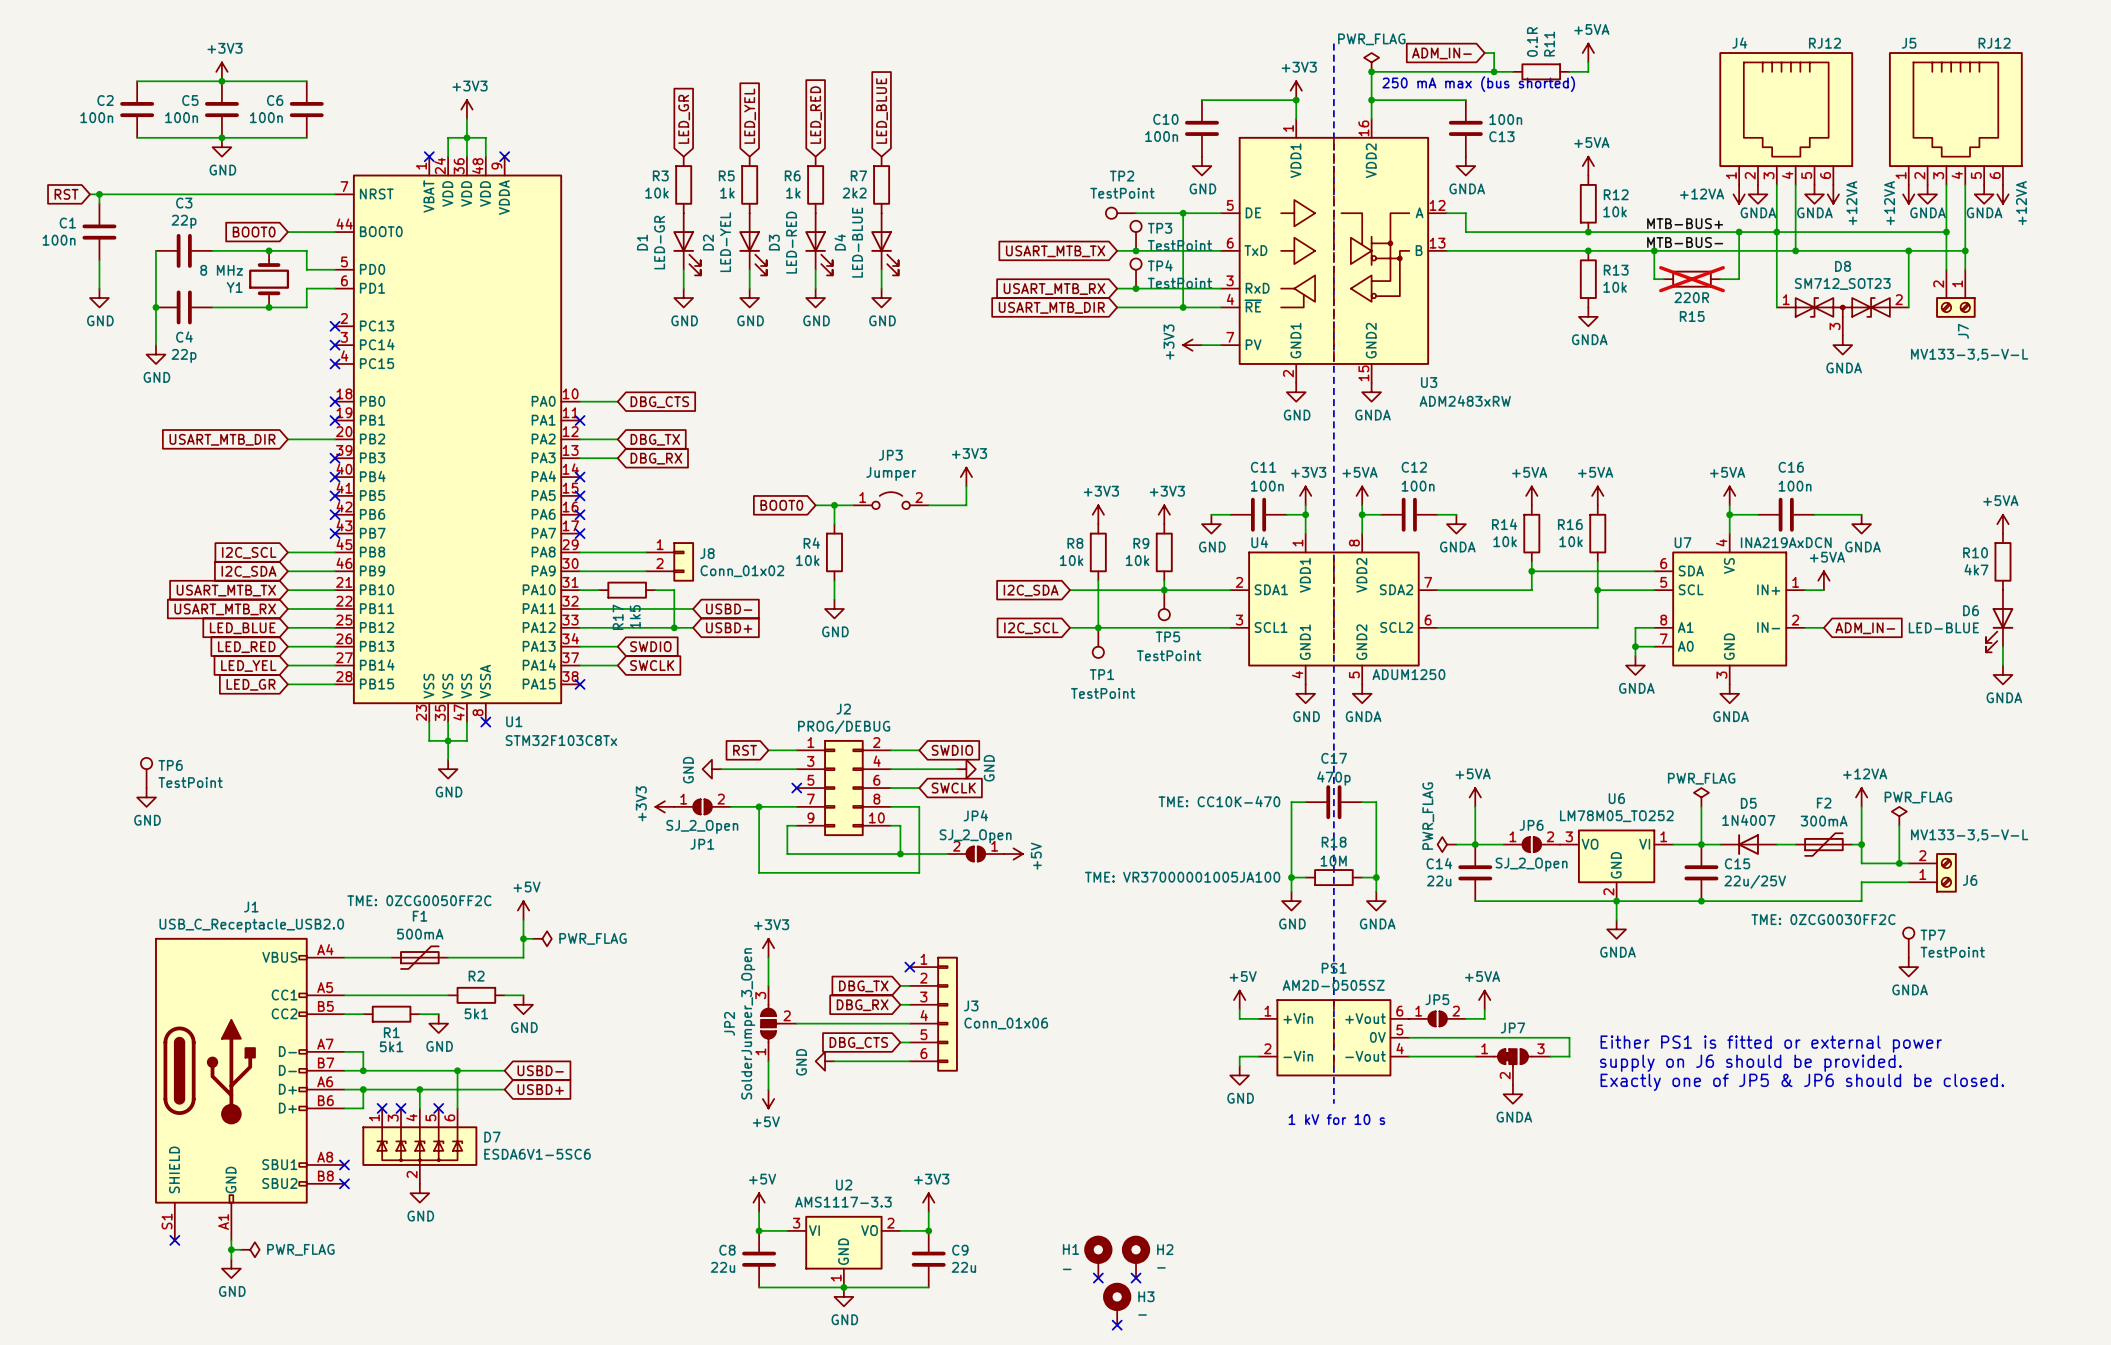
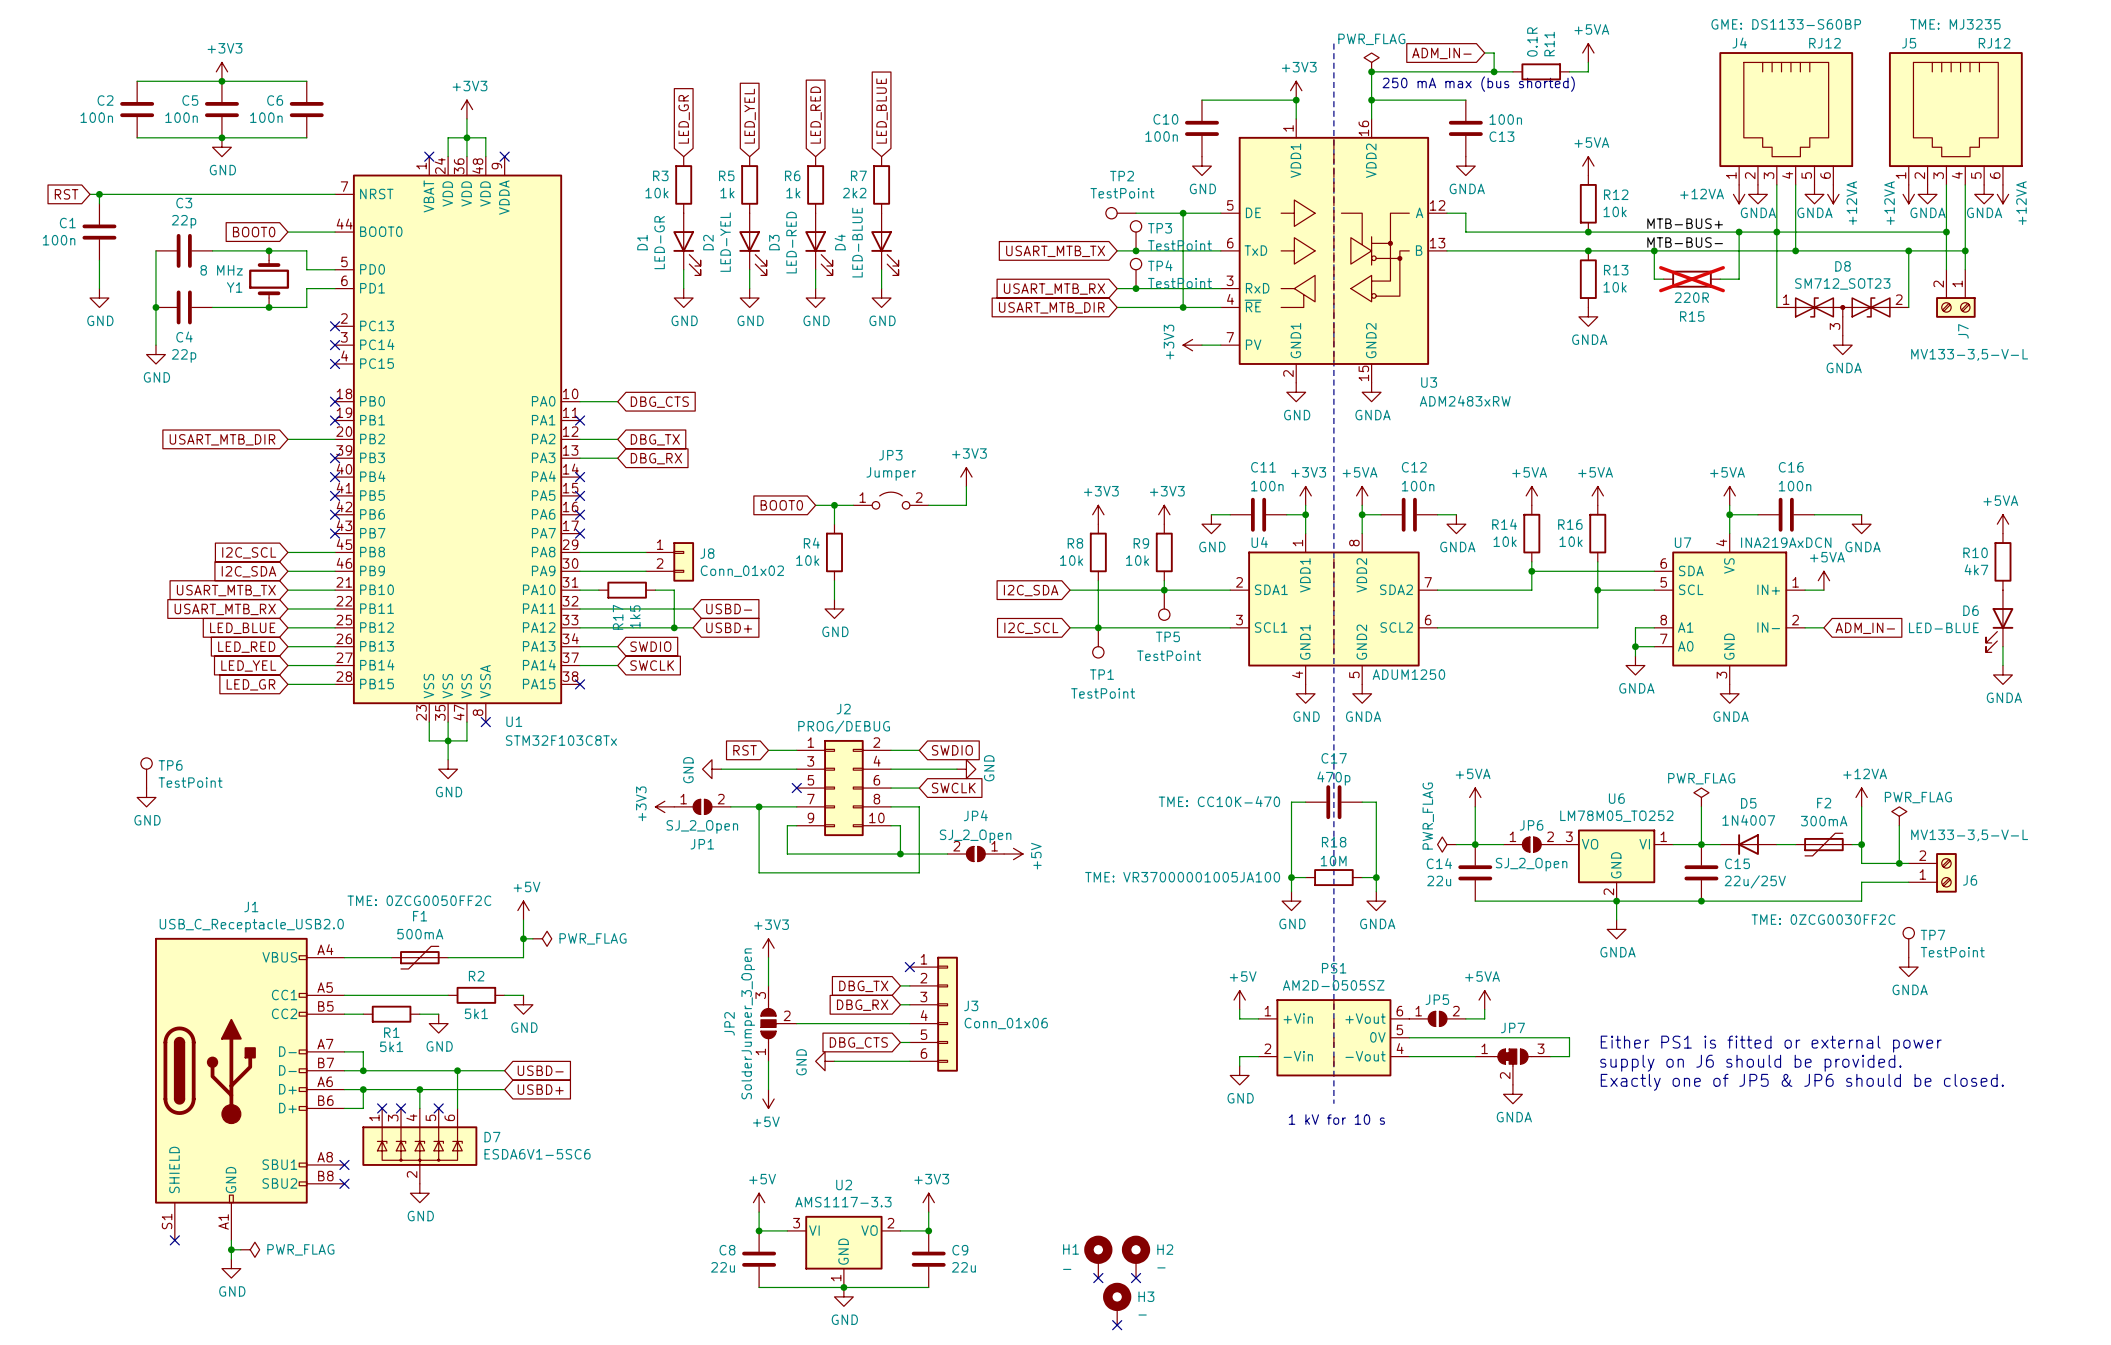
J5 text: none -> GME: DS1133-S60BP (1786, 24)
J5 text: none -> TME: MJ3235 (1955, 24)

